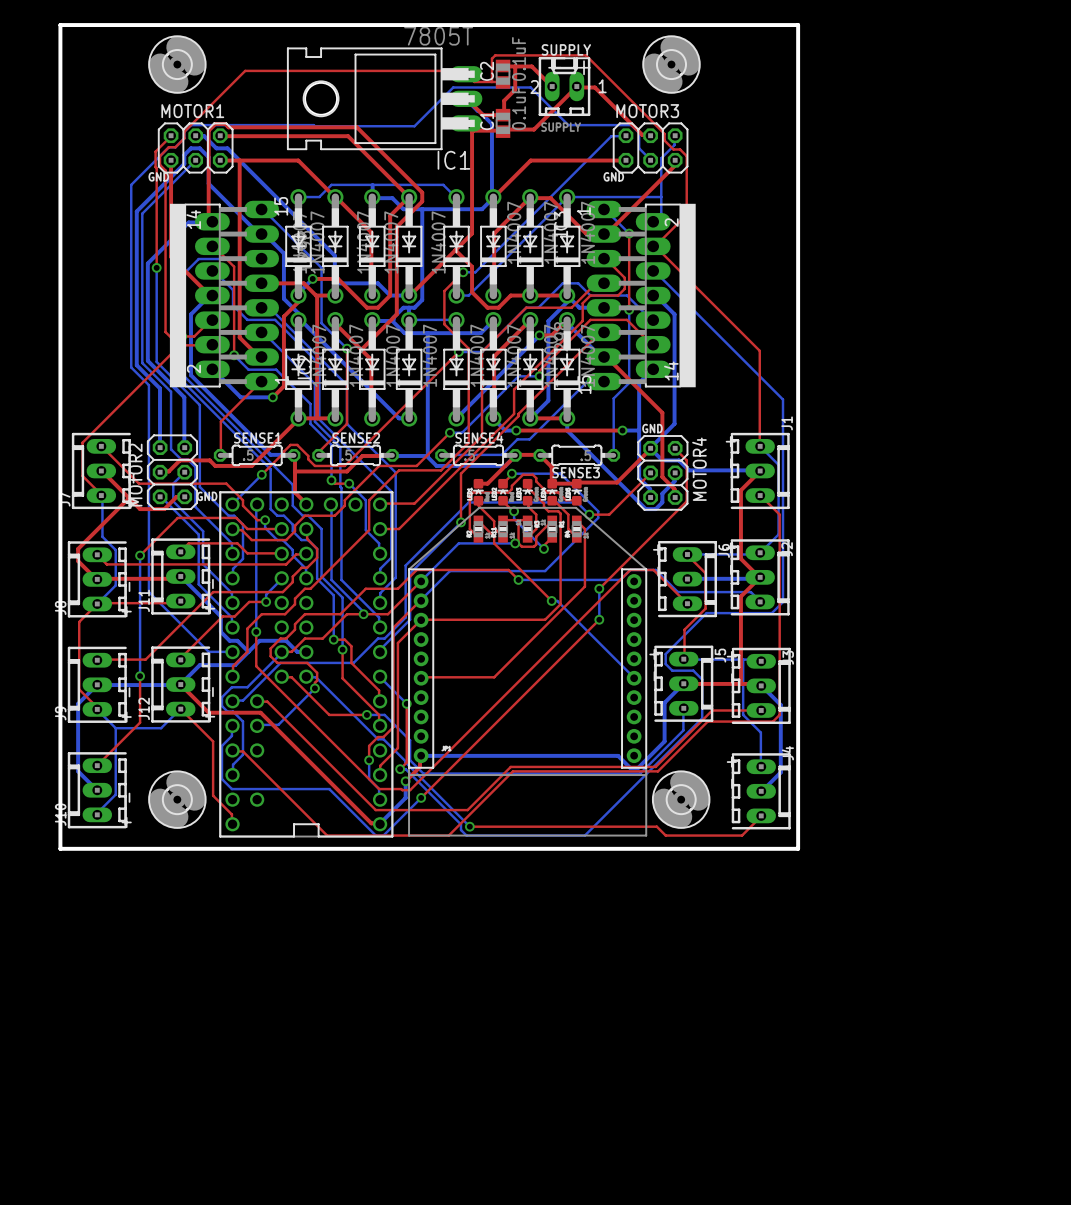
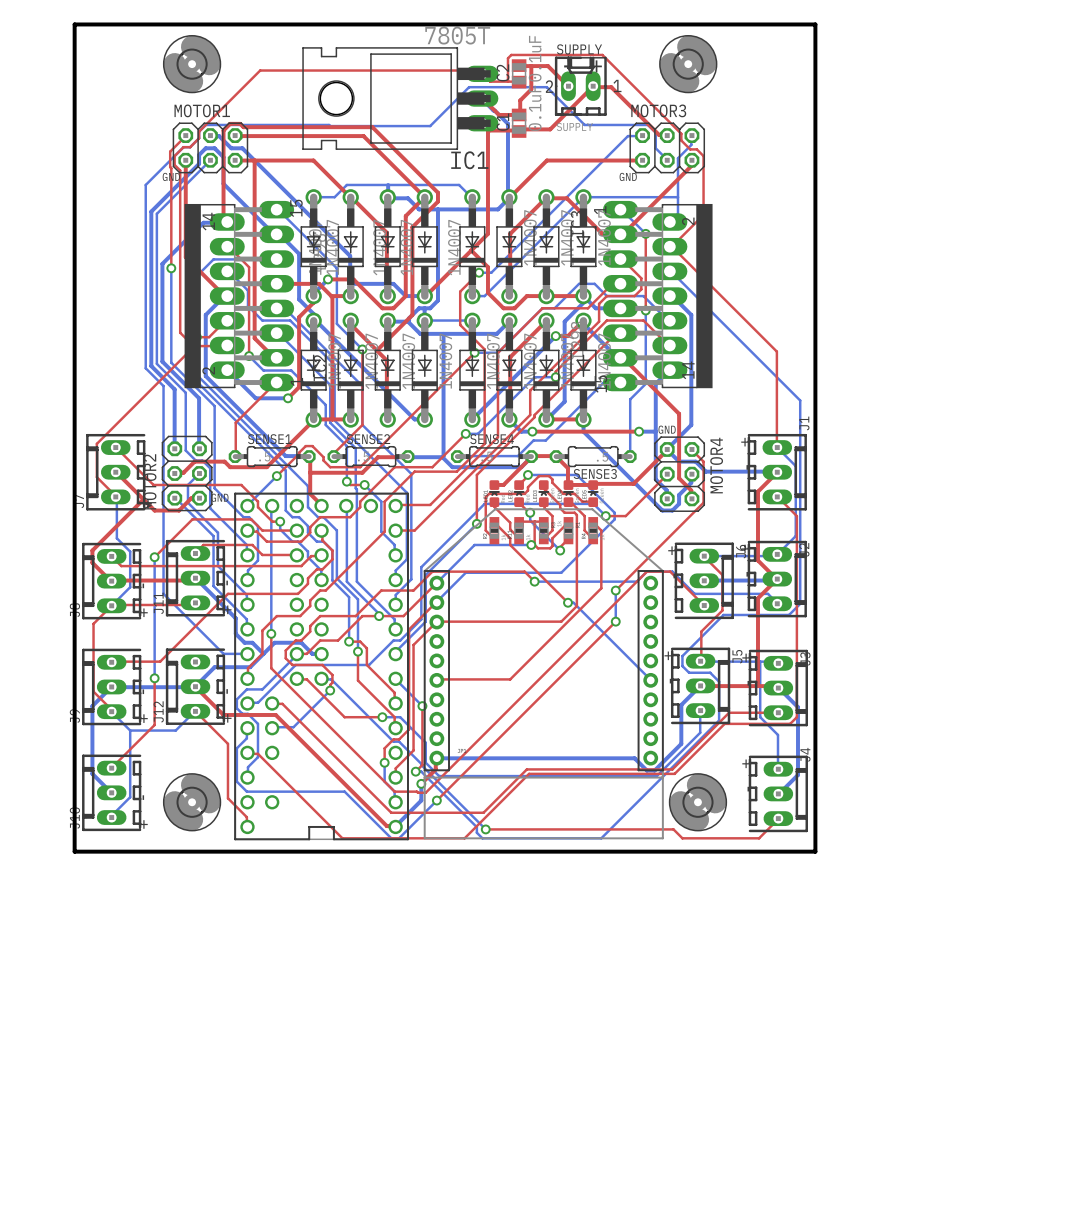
bottom track: (281, 578) (266, 594) (266, 601) -> none
top track: (266, 601) (249, 601) (234, 616) (222, 616) (180, 659) -> none
via: (266, 601) -> none

